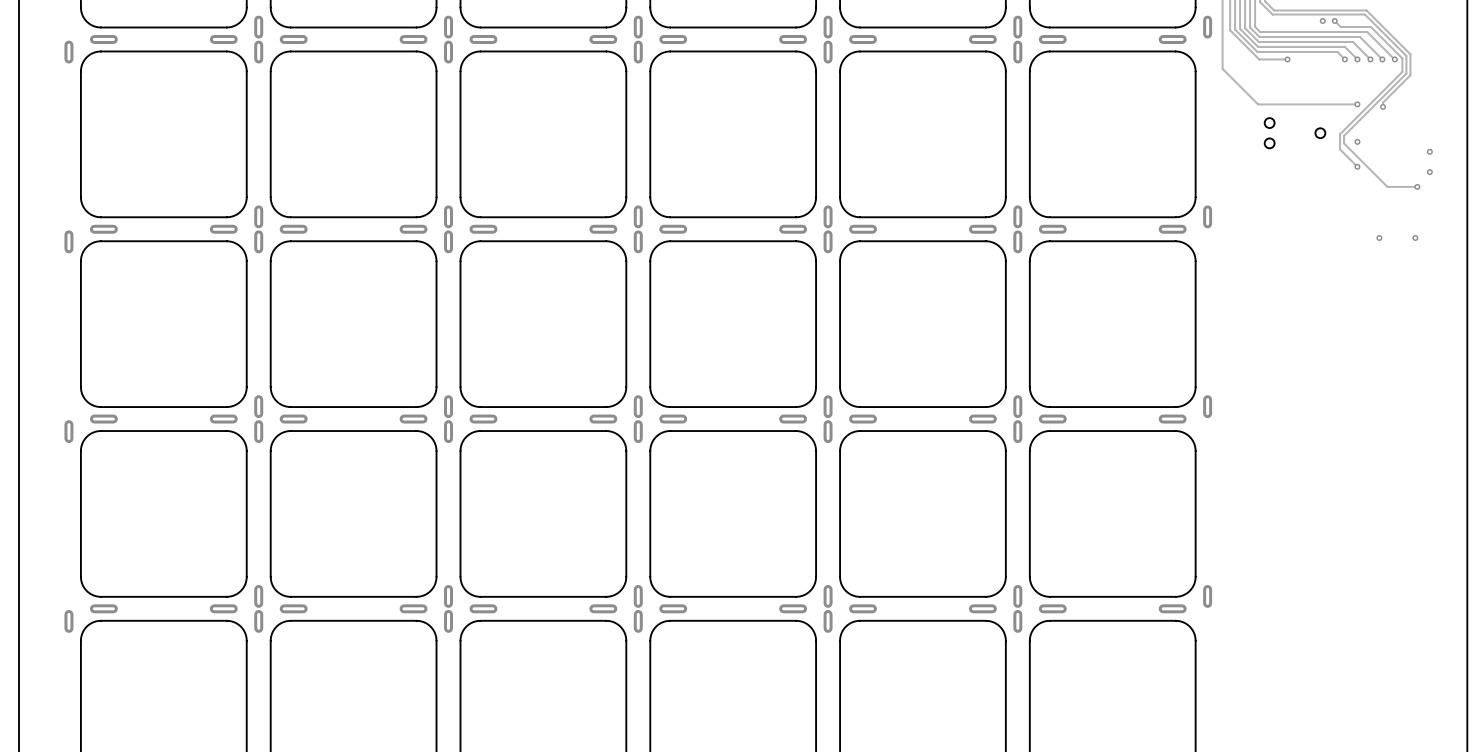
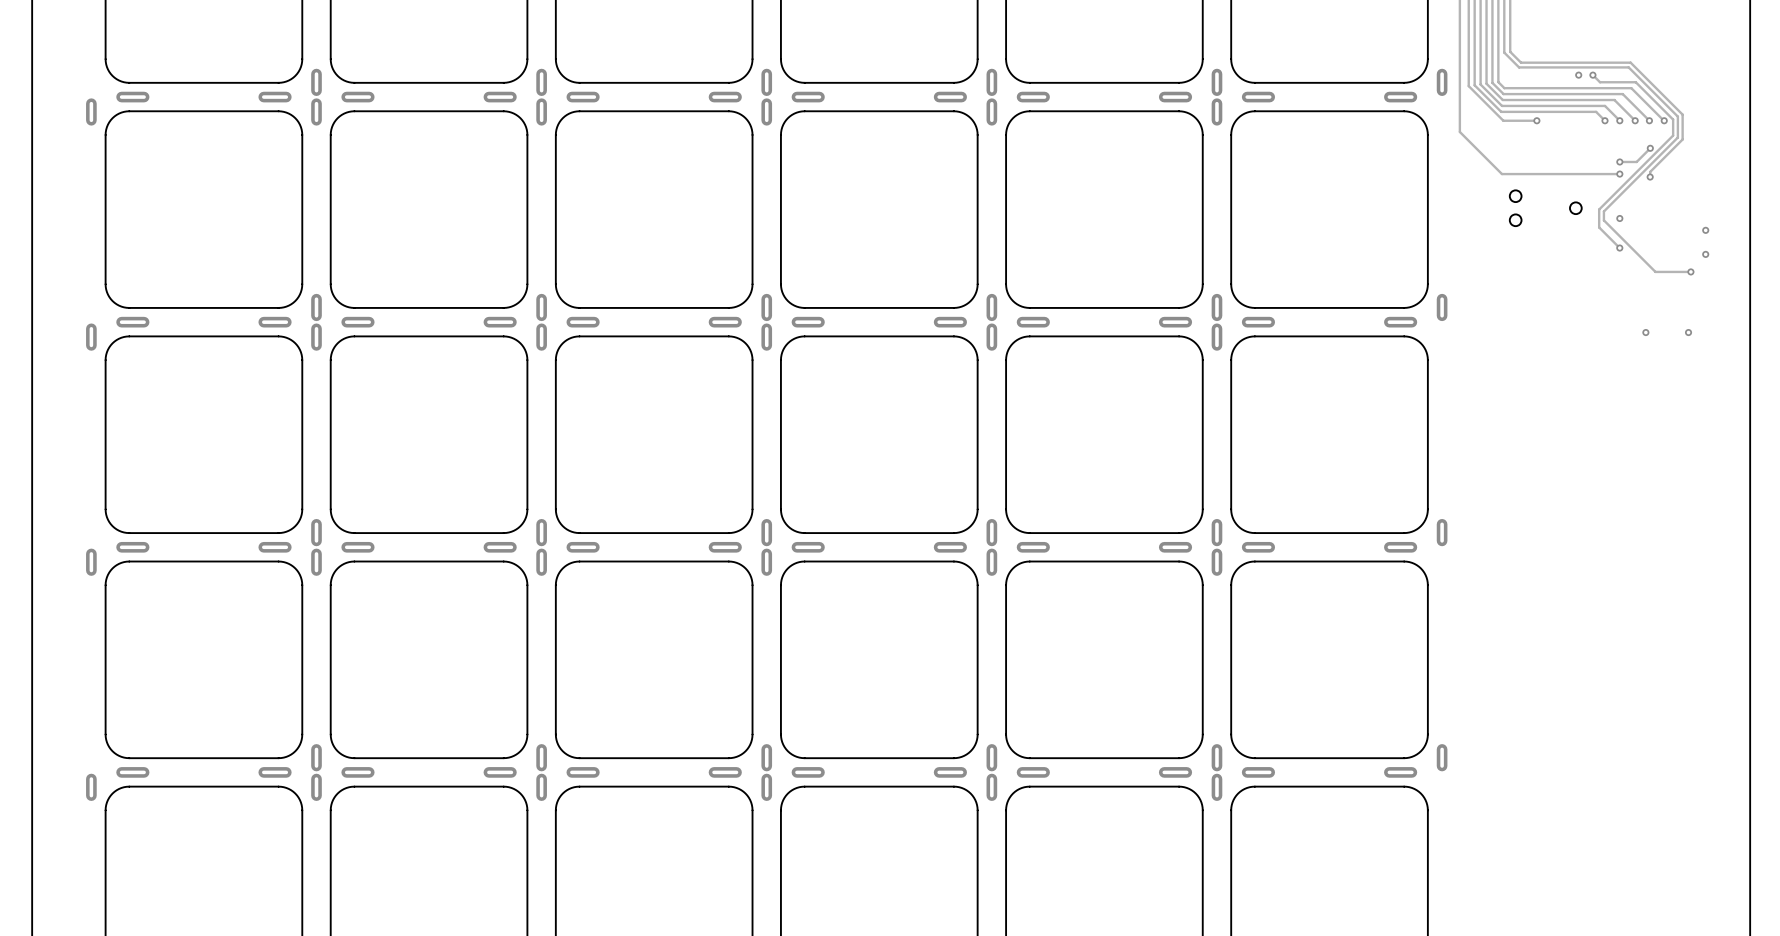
track: none -> (1650, 148) (1636, 161) (1619, 161)
via: none -> (1650, 148)
via: none -> (1619, 161)

